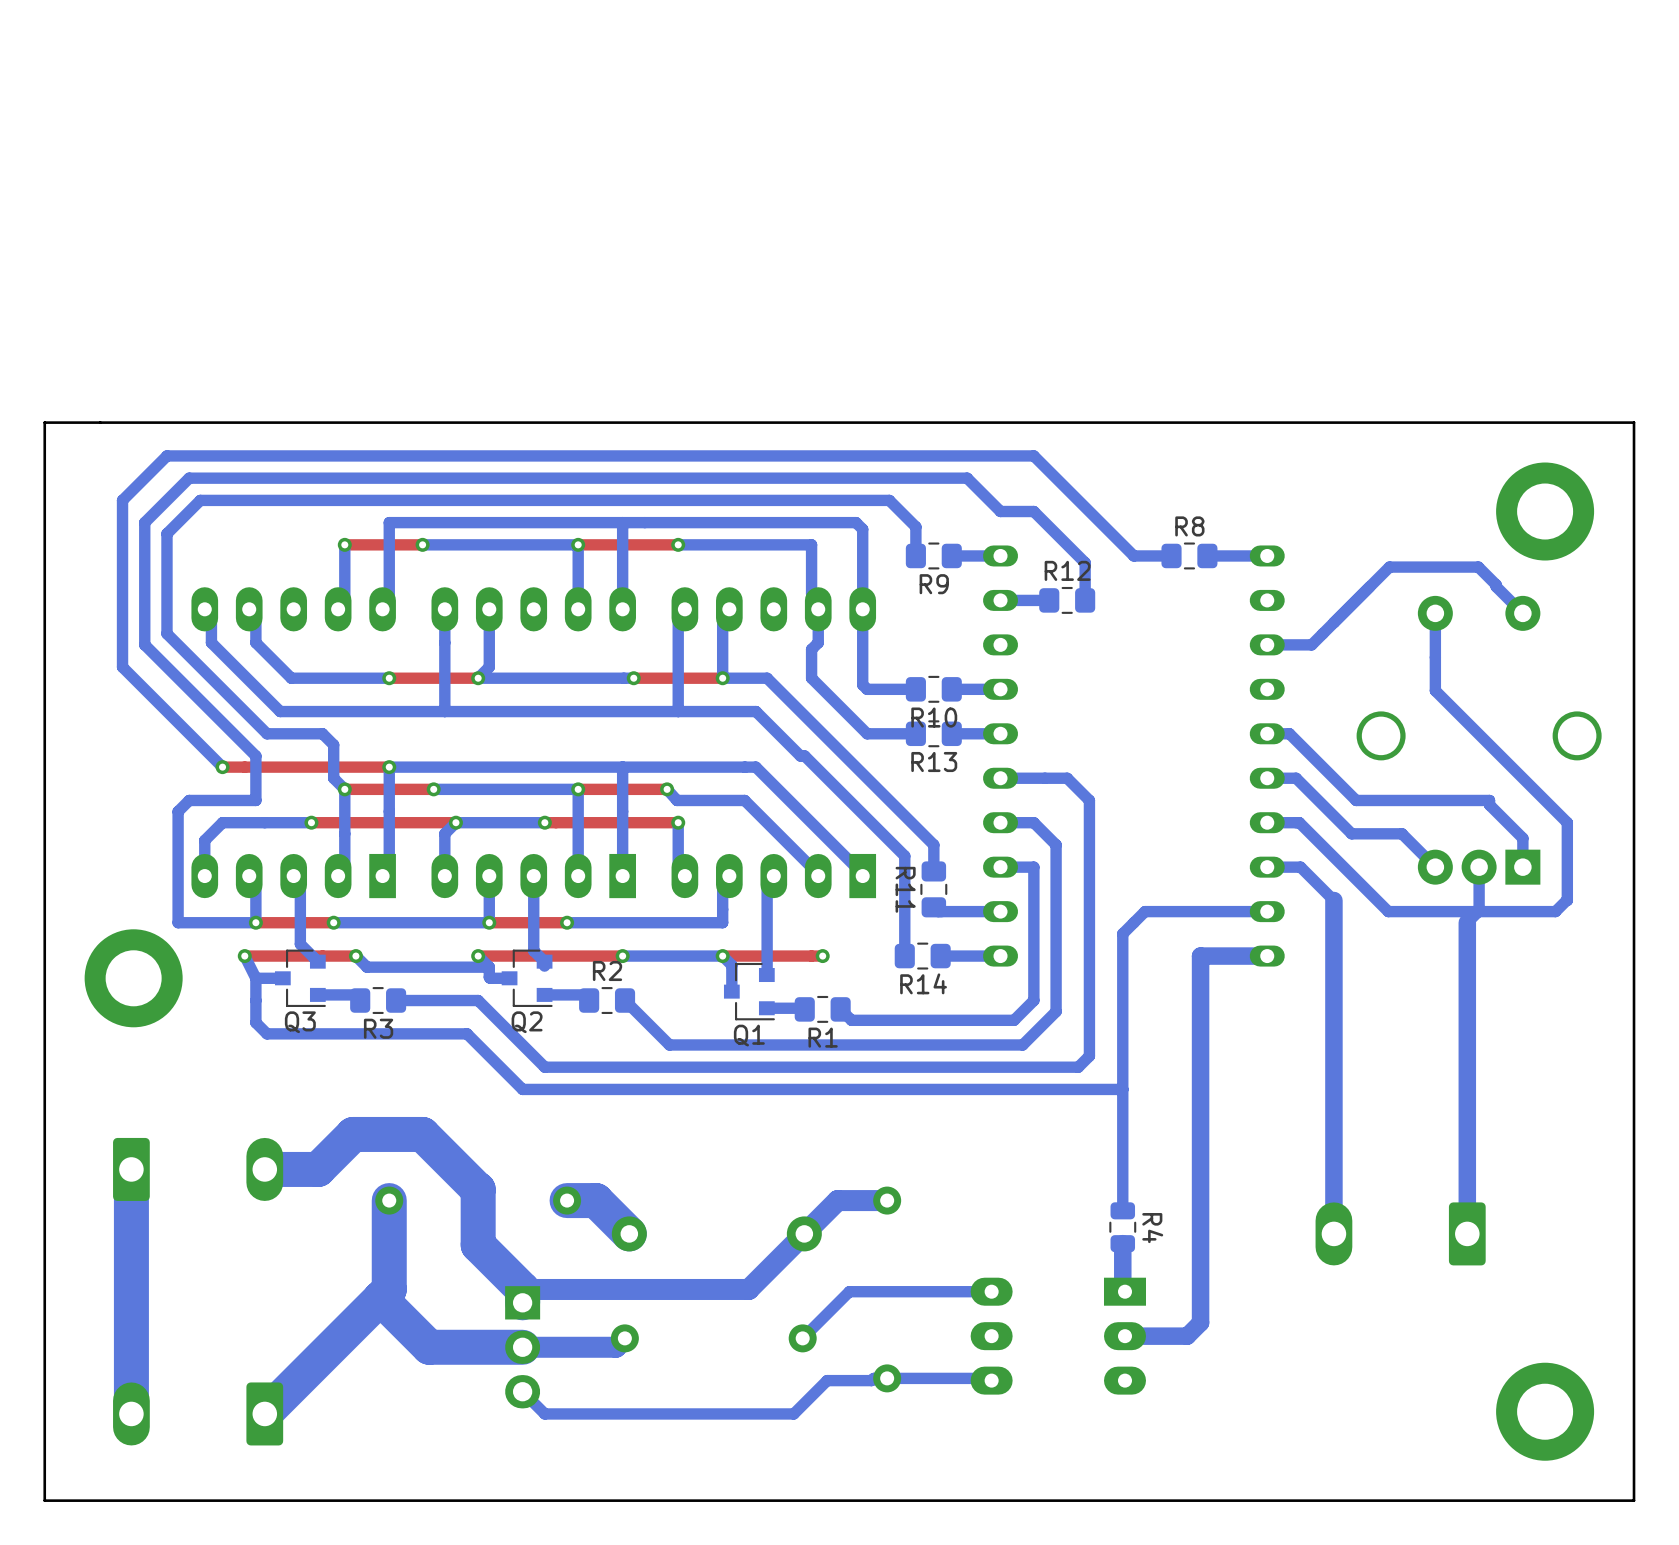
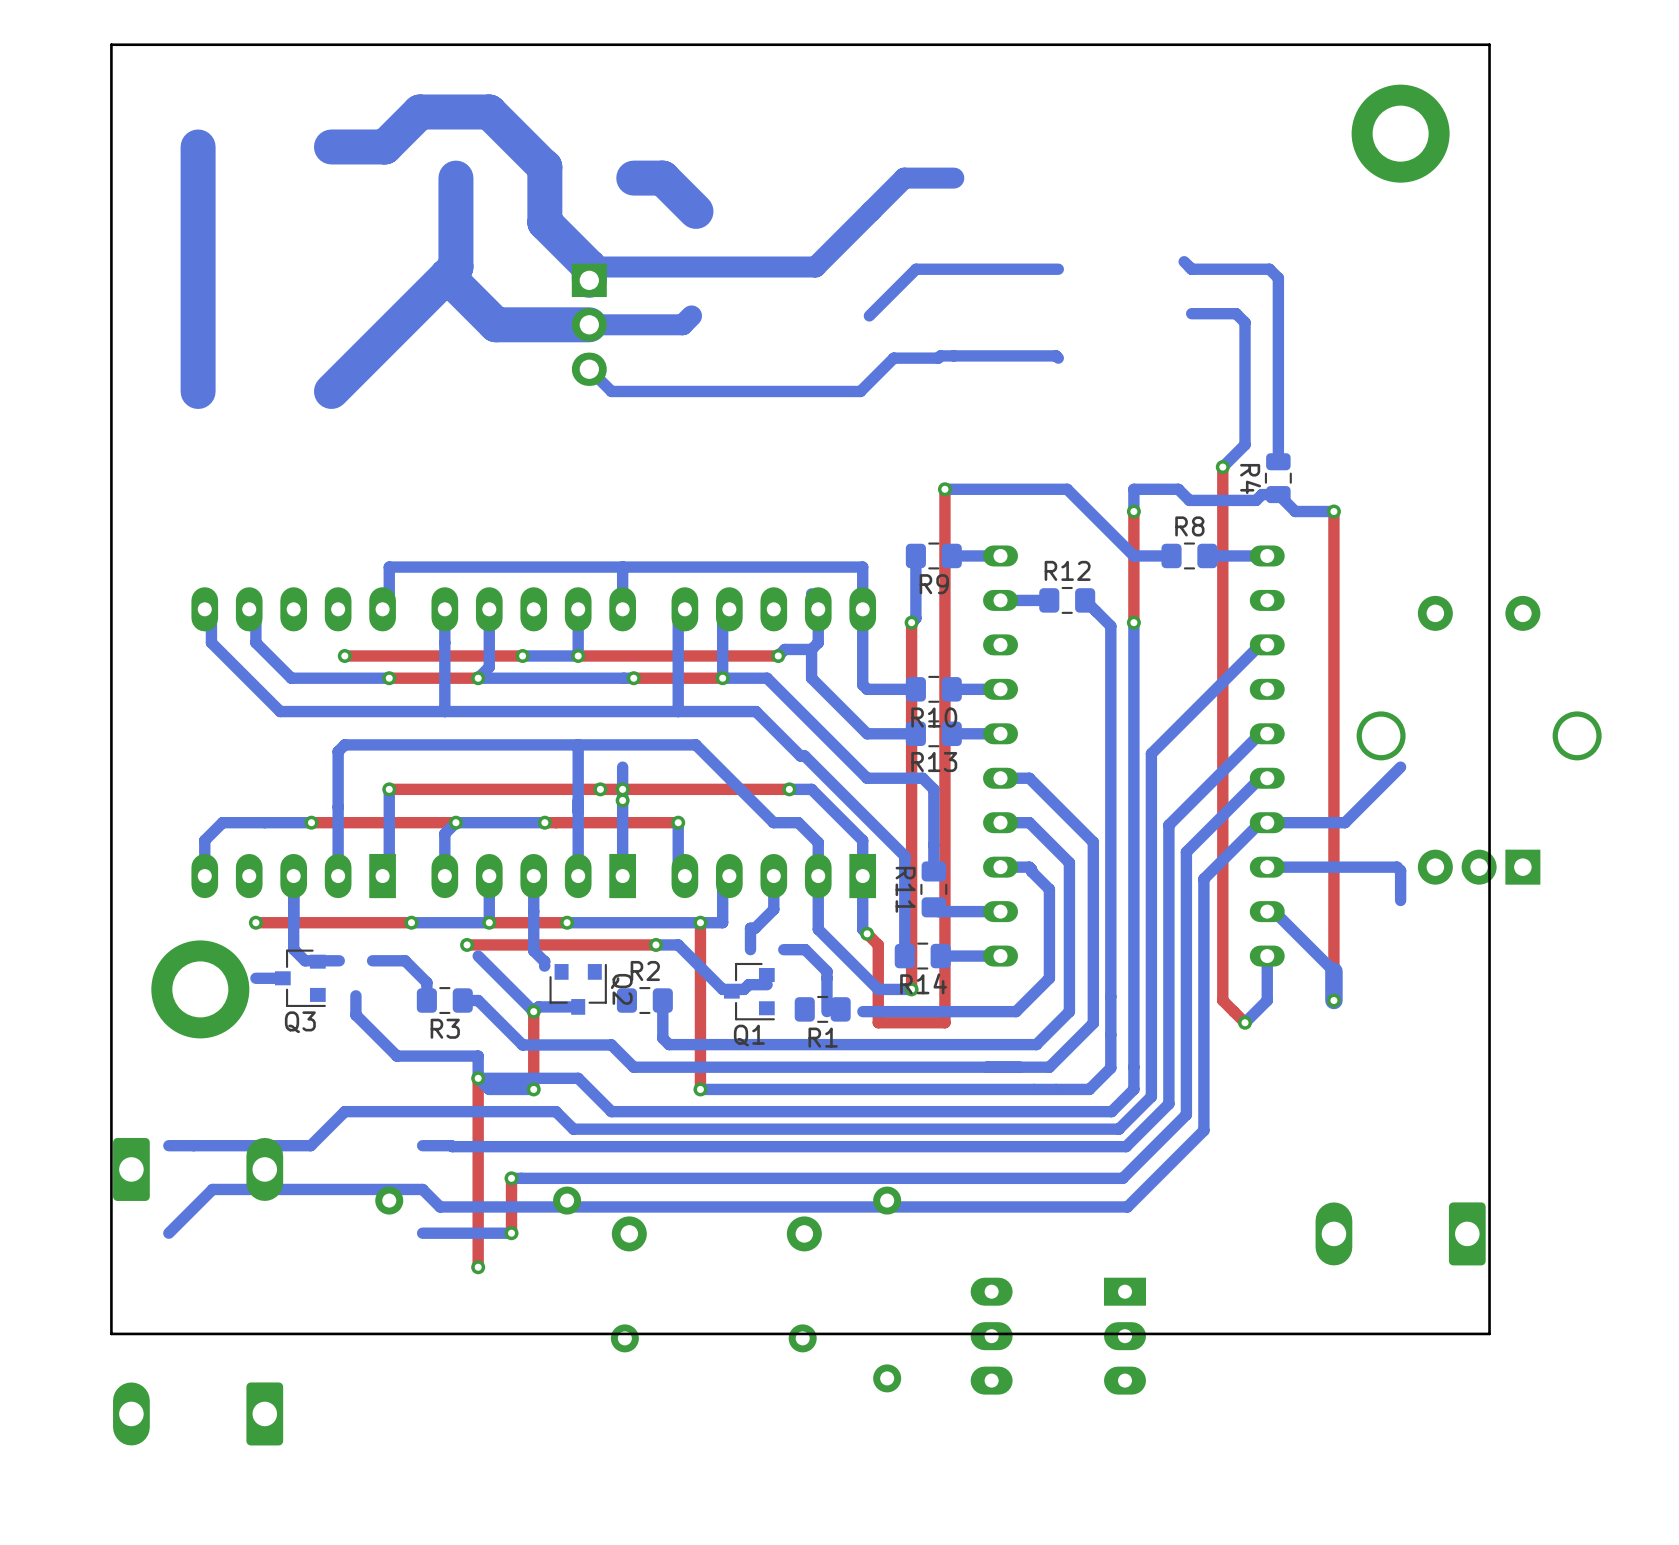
bottom track: none -> (198, 146) (198, 391)
bottom track: none -> (331, 146) (384, 146) (419, 111) (489, 111) (544, 166) (544, 222) (589, 267)
bottom track: none -> (455, 178) (455, 267) (331, 391)
bottom track: none -> (633, 178) (662, 178) (696, 211)
bottom track: none -> (953, 178) (904, 178) (815, 267) (589, 267)
bottom track: none -> (1184, 261) (1191, 269) (1269, 269) (1278, 278) (1278, 461)
bottom track: none -> (1058, 269) (916, 269) (869, 315)
bottom track: none -> (447, 275) (495, 324) (682, 324) (691, 315)
bottom track: none -> (1191, 313) (1236, 313) (1245, 322) (1245, 444) (1222, 467)
part: none -> (589, 324)
bottom track: none -> (1058, 358) (1056, 355) (940, 355) (938, 358) (893, 358) (860, 391) (611, 391) (589, 369)
board edge: (1634, 422) (44, 422) (44, 1500) (1634, 1500) (1634, 422) -> (1489, 44) (1489, 1333) (111, 1333) (111, 44) (1489, 44)
top track: none -> (1222, 467) (1222, 1000) (1245, 1022)
via: none -> (1222, 467)
top track: none -> (944, 489) (944, 1022) (878, 1022) (878, 944) (867, 933)
via: none -> (944, 489)
bottom track: (1067, 489) (1033, 455) (166, 455) (122, 500) (122, 667) (222, 767) -> (1067, 489) (944, 489)
top track: none -> (1133, 511) (1133, 622)
via: none -> (1133, 511)
bottom track: none -> (1333, 511) (1295, 511) (1278, 494) (1261, 494) (1256, 500) (1189, 500) (1178, 489) (1133, 489) (1133, 511)
top track: none -> (1333, 511) (1333, 1000)
via: none -> (1333, 511)
part position: (1545, 511) -> (1400, 133)
bottom track: (622, 522) (622, 567) -> none
bottom track: (344, 544) (344, 609) -> none
via: (344, 544) -> none
bottom track: (422, 544) (578, 544) (578, 609) -> (522, 655) (578, 655) (578, 609)
top track: (422, 544) (344, 544) -> (411, 922) (333, 922)
via: (422, 544) -> none
via: (578, 544) -> none
bottom track: (678, 544) (811, 544) (811, 593) -> none
top track: (678, 544) (578, 544) -> none
via: (678, 544) -> none
bottom track: (915, 555) (915, 526) (889, 500) (200, 500) (166, 533) (166, 633) (267, 733) (322, 733) (333, 744) (333, 778) (344, 789) (344, 876) -> (915, 555) (915, 618) (911, 622)
bottom track: (862, 567) (862, 529) (856, 522) (389, 522) (389, 567) -> (862, 567) (389, 567)
bottom track: (1085, 600) (1085, 562) (1033, 511) (1000, 511) (967, 478) (189, 478) (144, 522) (144, 644) (255, 756) (255, 800) (189, 800) (178, 811) (178, 922) (255, 922) (255, 876) -> none
bottom track: (1435, 613) (1435, 690) (1567, 822) (1567, 900) (1555, 911) (1388, 911) (1299, 822) -> (1400, 767) (1345, 822) (1299, 822)
bottom track: (1522, 613) (1478, 567) (1389, 567) (1311, 644) (1267, 644) -> (168, 1145) (310, 1145) (344, 1111) (555, 1111) (573, 1129) (1118, 1129) (1151, 1096) (1151, 753) (1260, 644) (1267, 644)
top track: none -> (911, 622) (911, 989)
via: none -> (911, 622)
bottom track: none -> (1133, 622) (1133, 1089) (1111, 1111) (611, 1111) (578, 1078) (478, 1078)
via: none -> (1133, 622)
bottom track: none -> (811, 649) (784, 649) (778, 655)
via: none -> (344, 655)
top track: none -> (522, 655) (344, 655)
via: none -> (522, 655)
via: none -> (578, 655)
top track: none -> (778, 655) (578, 655)
via: none -> (778, 655)
bottom track: (1267, 733) (1289, 733) (1356, 800) (1489, 800) (1489, 804) (1522, 838) (1522, 867) -> (1267, 733) (1260, 733) (1168, 825) (1168, 1103) (1126, 1146) (422, 1145)
via: (222, 767) -> none
top track: (389, 767) (222, 767) -> none
via: (389, 767) -> none
bottom track: (867, 778) (933, 844) -> (867, 778) (922, 778) (933, 789) (933, 844)
bottom track: (1029, 778) (1067, 778) (1089, 800) (1089, 1056) (1078, 1067) (1049, 1067) -> (1029, 778) (1093, 842) (1093, 1023) (1049, 1067)
bottom track: (1267, 778) (1296, 778) (1351, 833) (1402, 833) (1435, 867) -> (1267, 778) (1260, 778) (1186, 852) (1186, 1114) (1122, 1178) (511, 1178)
via: (344, 789) -> none
bottom track: (389, 789) (389, 767) (755, 767) (856, 867) -> none
top track: (389, 789) (344, 789) -> none
via: none -> (389, 789)
via: (433, 789) -> none
bottom track: (578, 789) (433, 789) -> (578, 789) (578, 744)
via: (578, 789) -> none
via: none -> (600, 789)
via: none -> (622, 789)
bottom track: (667, 789) (677, 800) (744, 800) (811, 867) -> none
via: (667, 789) -> none
bottom track: none -> (789, 789) (811, 789) (862, 840) (862, 929) (867, 933)
top track: none -> (789, 789) (667, 789)
via: none -> (789, 789)
via: none -> (622, 800)
bottom track: (1029, 822) (1033, 822) (1056, 844) (1056, 1011) (1022, 1044) (669, 1044) -> (1029, 822) (1069, 862) (1069, 1011) (1036, 1044) (669, 1044)
bottom track: none -> (1267, 822) (1260, 822) (1203, 879) (1203, 1130) (1127, 1206) (440, 1206) (422, 1189) (212, 1189) (168, 1233)
bottom track: (1029, 867) (1033, 867) (1033, 1000) (1014, 1020) (851, 1020) (840, 1009) -> (1029, 867) (1049, 889) (1049, 978) (1016, 1011) (862, 1011)
bottom track: (1300, 867) (1333, 900) (1333, 971) -> (1267, 911) (1274, 911) (1333, 971)
bottom track: none -> (1300, 867) (1397, 867) (1400, 870) (1400, 900)
bottom track: (1479, 867) (1479, 910) (1467, 922) (1467, 1233) -> none
bottom track: none -> (293, 876) (293, 949) (305, 960) (339, 960)
bottom track: (300, 876) (300, 944) (317, 961) -> none
bottom track: none -> (338, 876) (338, 751) (344, 744) (695, 744) (773, 822) (798, 822) (818, 842) (818, 929) (878, 989) (911, 989)
bottom track: (767, 876) (766, 975) -> none
bottom track: none -> (773, 876) (773, 909) (755, 928) (750, 928) (750, 949)
bottom track: (1267, 911) (1145, 911) (1122, 933) (1122, 1210) -> none
via: (333, 922) -> none
bottom track: (411, 922) (333, 922) -> none
via: none -> (411, 922)
top track: none -> (700, 922) (700, 1089)
via: none -> (700, 922)
via: none -> (867, 933)
bottom track: none -> (655, 944) (678, 944) (722, 989) (744, 989) (748, 984) (767, 984)
top track: none -> (655, 944) (467, 944)
via: none -> (655, 944)
bottom track: none -> (783, 949) (805, 949) (826, 971) (826, 1011)
bottom track: (244, 956) (255, 978) (255, 1022) (267, 1033) (467, 1033) (522, 1089) -> (478, 1078) (489, 1089) (522, 1089)
via: (244, 956) -> none
bottom track: (355, 956) (367, 967) (489, 967) (490, 978) (509, 978) -> none
top track: (355, 956) (244, 956) -> none
via: (355, 956) -> none
via position: (478, 956) -> (467, 944)
bottom track: (622, 956) (722, 956) (731, 965) (731, 991) -> none
top track: (622, 956) (478, 956) -> (578, 789) (433, 789)
via: (622, 956) -> none
via: (722, 956) -> none
top track: (822, 956) (722, 956) -> none
via: (822, 956) -> none
bottom track: (1267, 956) (1200, 956) (1200, 1322) (1187, 1336) (1124, 1336) -> (1267, 956) (1267, 1000) (1245, 1022)
bottom track: none -> (372, 960) (405, 960) (426, 982) (426, 1000)
bottom track: none -> (489, 967) (533, 1011) (538, 1006) (578, 1006)
part position: (133, 978) -> (200, 989)
Q2 rotation: 0° (527, 978) -> 90° counterclockwise (578, 989)
Q2 position: (527, 978) -> (578, 989)
via: none -> (911, 989)
bottom track: (317, 994) (354, 994) (360, 1000) -> none
bottom track: (544, 994) (583, 994) (589, 1000) -> none
bottom track: none -> (355, 995) (355, 1015) (396, 1056) (478, 1056) (478, 1078)
R3 position: (378, 1000) -> (444, 1000)
bottom track: (462, 1000) (396, 1000) -> none
R2 position: (607, 1000) -> (644, 1000)
bottom track: (625, 1000) (662, 1038) -> (662, 1000) (662, 1038)
bottom track: (1333, 1000) (1333, 1246) -> none
via: none -> (1333, 1000)
bottom track: (766, 1008) (804, 1009) -> none
top track: none -> (533, 1011) (533, 1089)
via: none -> (533, 1011)
via: none -> (1245, 1022)
bottom track: (522, 1044) (544, 1067) (633, 1067) -> (522, 1044) (611, 1044) (633, 1067)
top track: none -> (478, 1078) (478, 1267)
via: none -> (478, 1078)
via: none -> (533, 1089)
bottom track: (700, 1089) (533, 1089) -> none
via: none -> (700, 1089)
bottom track: (1122, 1089) (1089, 1089) -> (1085, 600) (1110, 626) (1110, 1068) (1089, 1089)
bottom track: (131, 1169) (131, 1413) -> none
bottom track: (264, 1169) (318, 1169) (353, 1134) (422, 1134) (478, 1189) (478, 1245) (522, 1289) -> none
top track: none -> (511, 1178) (511, 1233)
via: none -> (511, 1178)
bottom track: (389, 1200) (389, 1289) (264, 1413) -> none
bottom track: (567, 1200) (595, 1200) (629, 1233) -> none
bottom track: (887, 1200) (837, 1200) (748, 1289) (522, 1289) -> none
R4 position: (1122, 1227) -> (1278, 478)
R4 name position: R4 (1152, 1228) -> R4 (1250, 479)
bottom track: none -> (511, 1233) (422, 1233)
via: none -> (511, 1233)
bottom track: (1122, 1243) (1122, 1289) (1124, 1291) -> none
via: none -> (478, 1267)
bottom track: (991, 1291) (849, 1291) (802, 1338) -> none
bottom track: (380, 1298) (429, 1347) (615, 1347) (624, 1338) -> none
part: (522, 1347) -> none
bottom track: (991, 1380) (989, 1378) (873, 1378) (871, 1380) (827, 1380) (793, 1413) (544, 1413) (522, 1391) -> none
part: (1545, 1411) -> none

